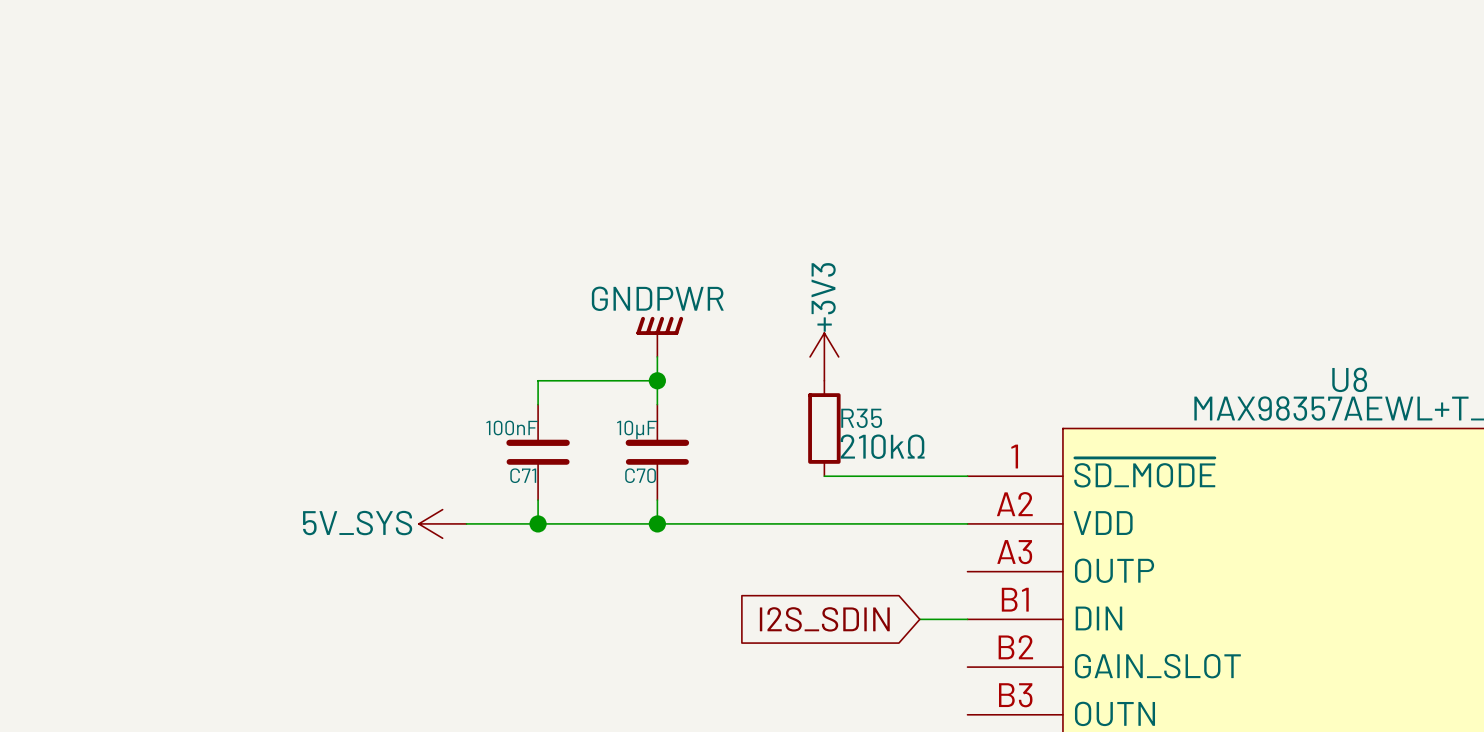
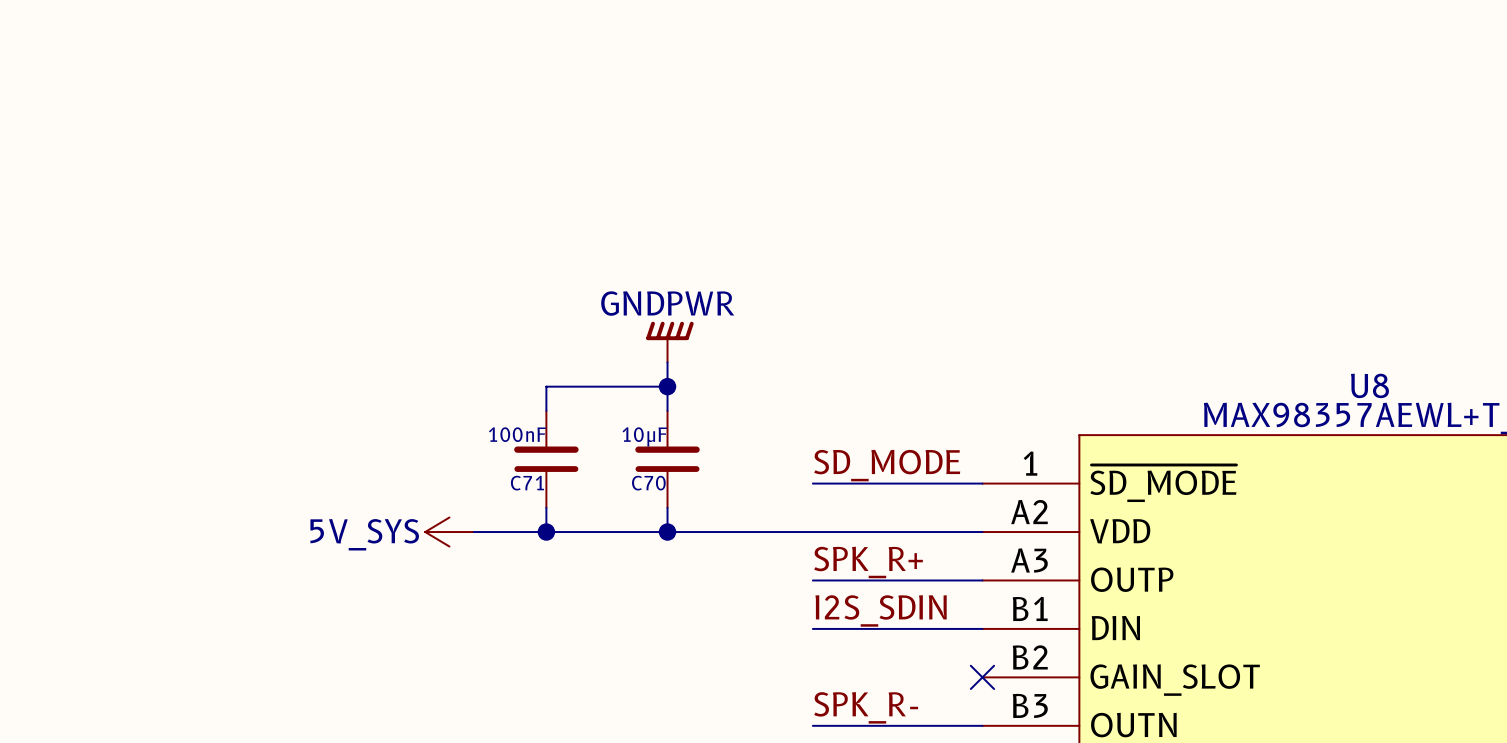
power symbol: +3V3 (824, 356) -> none
R35: 210kΩ (824, 428) -> none
label: none -> SD_MODE (887, 465)
wire: none -> (812, 483) (837, 483)
label: none -> SPK_R+ (868, 562)
wire: none -> (812, 580) (982, 580)
label: none -> I2S_SDIN (881, 610)
wire: none -> (812, 628) (934, 628)
global label: I2S_SDIN (824, 619) -> none
no-connect mark: none -> (982, 677)
label: none -> SPK_R- (866, 707)
wire: none -> (812, 725) (982, 725)

